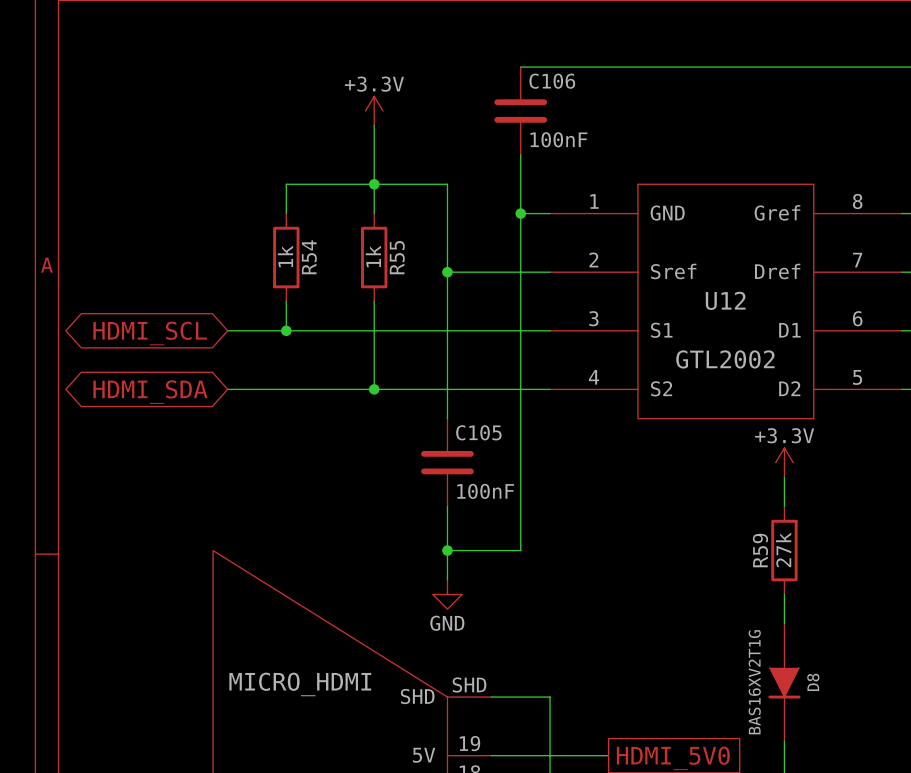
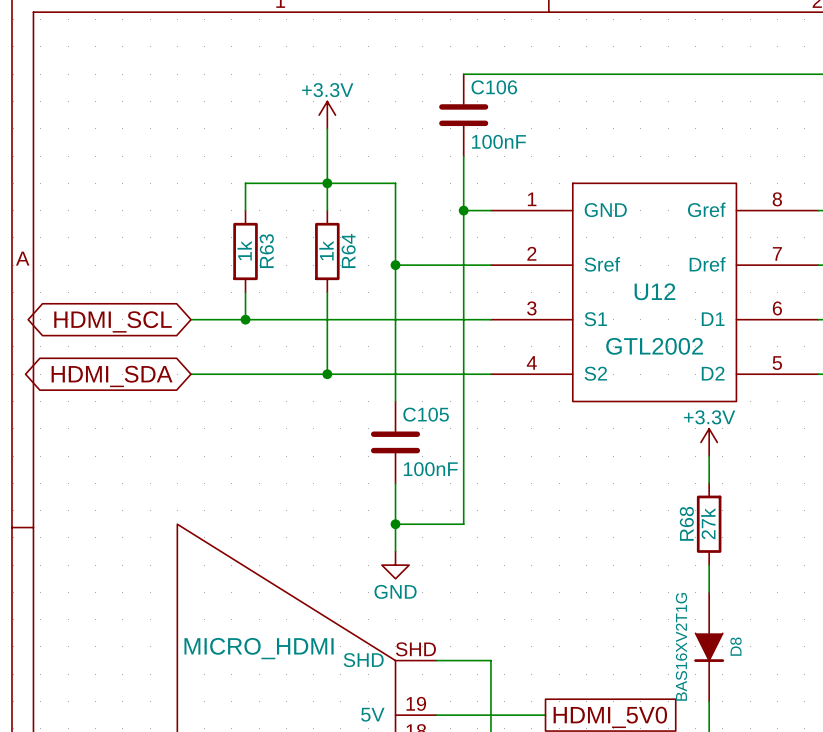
R54 name: R54 (309, 257) -> R63 (266, 251)
R55 name: R55 (397, 257) -> R64 (348, 250)
R59 name: R59 (760, 550) -> R68 (686, 523)

